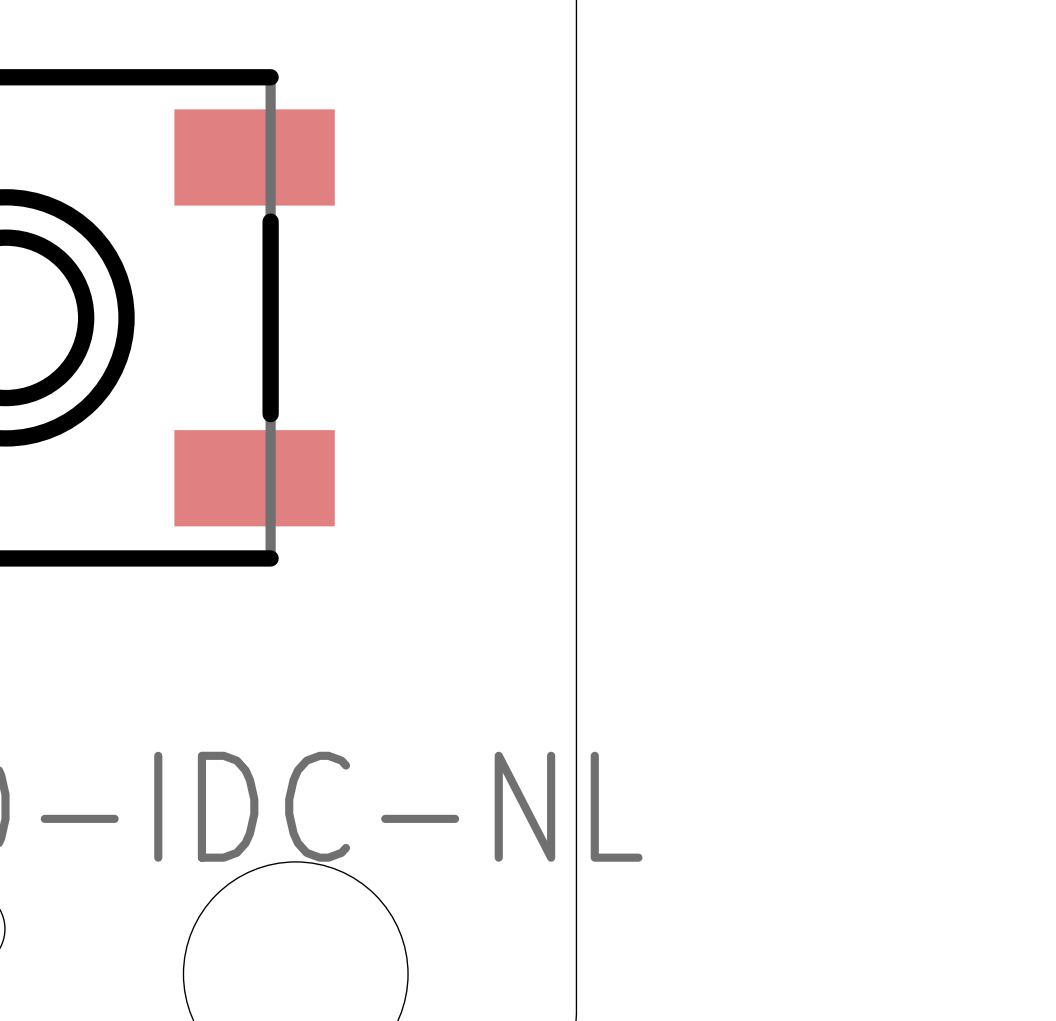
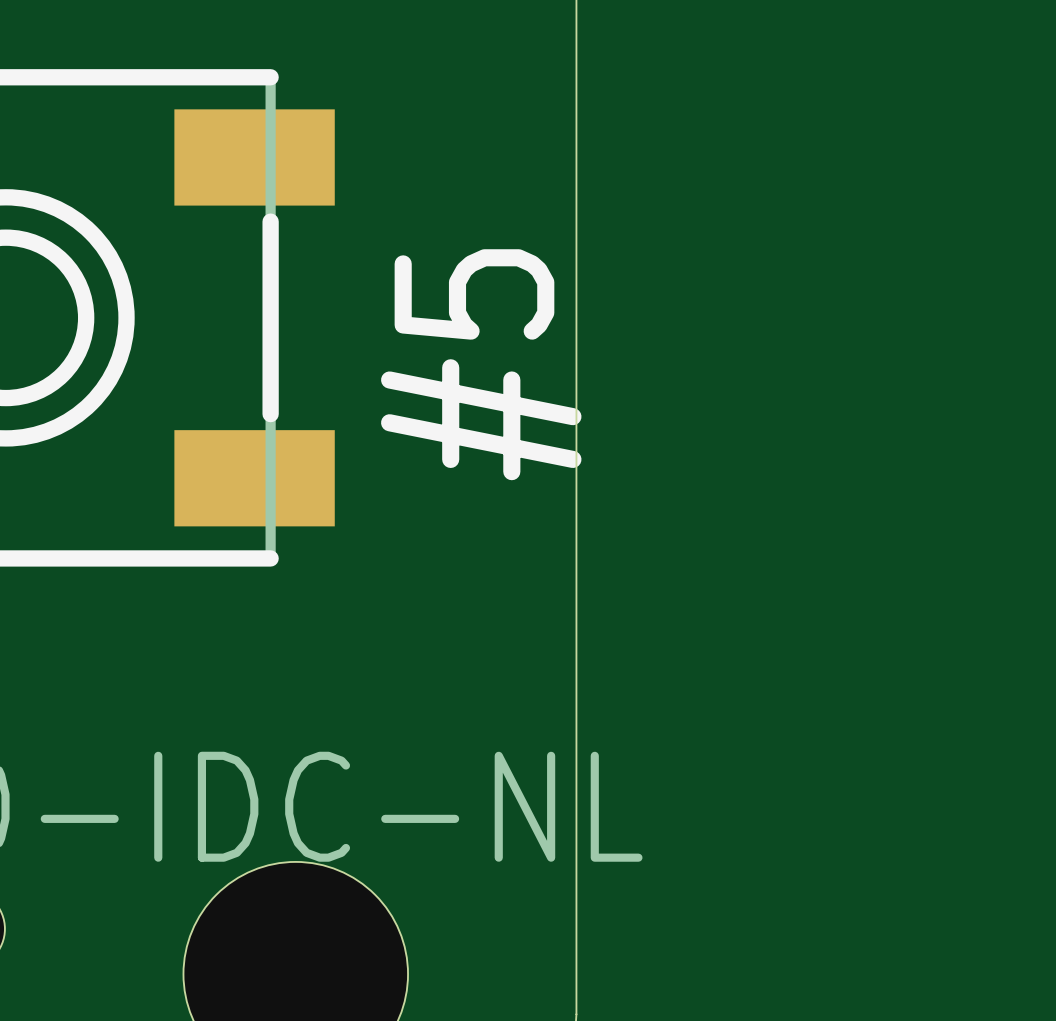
text: none -> #5 (481, 364)

